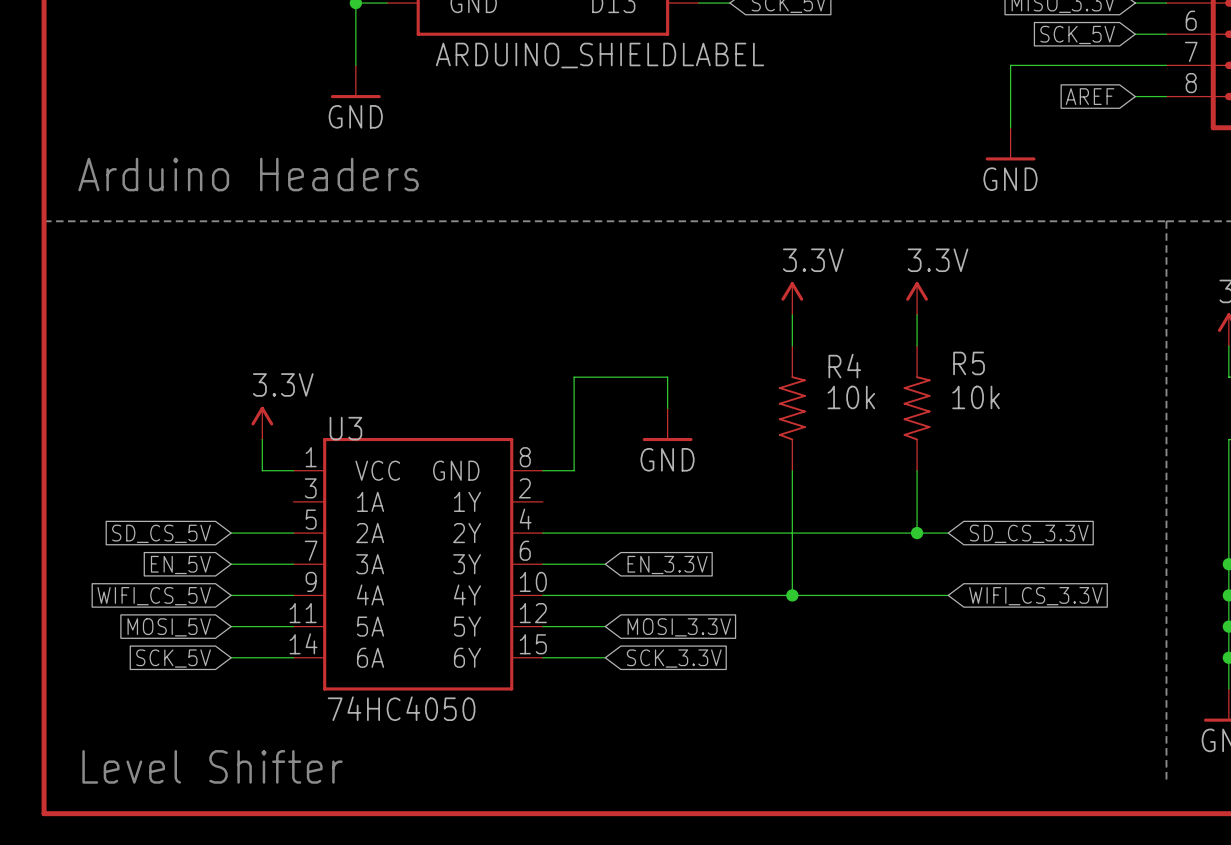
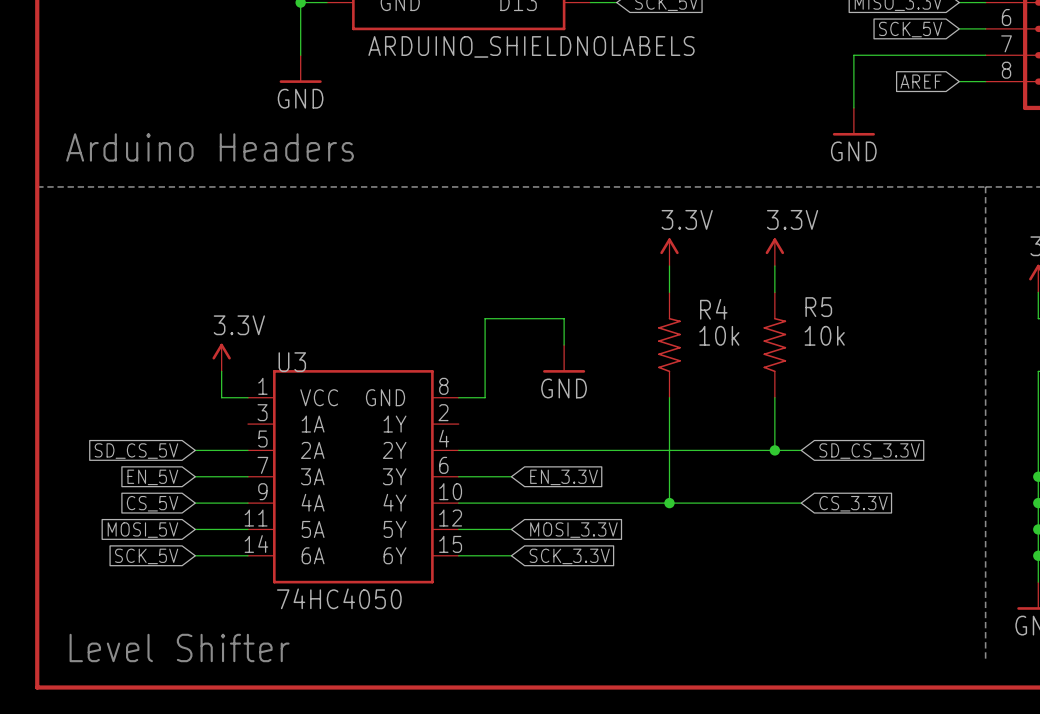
part value: ARDUINO_SHIELDLABEL (600, 55) -> ARDUINO_SHIELDNOLABELS (531, 46)
global label: WIFI_CS_5V (154, 596) -> CS_5V (152, 503)
global label: WIFI_CS_3.3V (1035, 596) -> CS_3.3V (853, 503)

